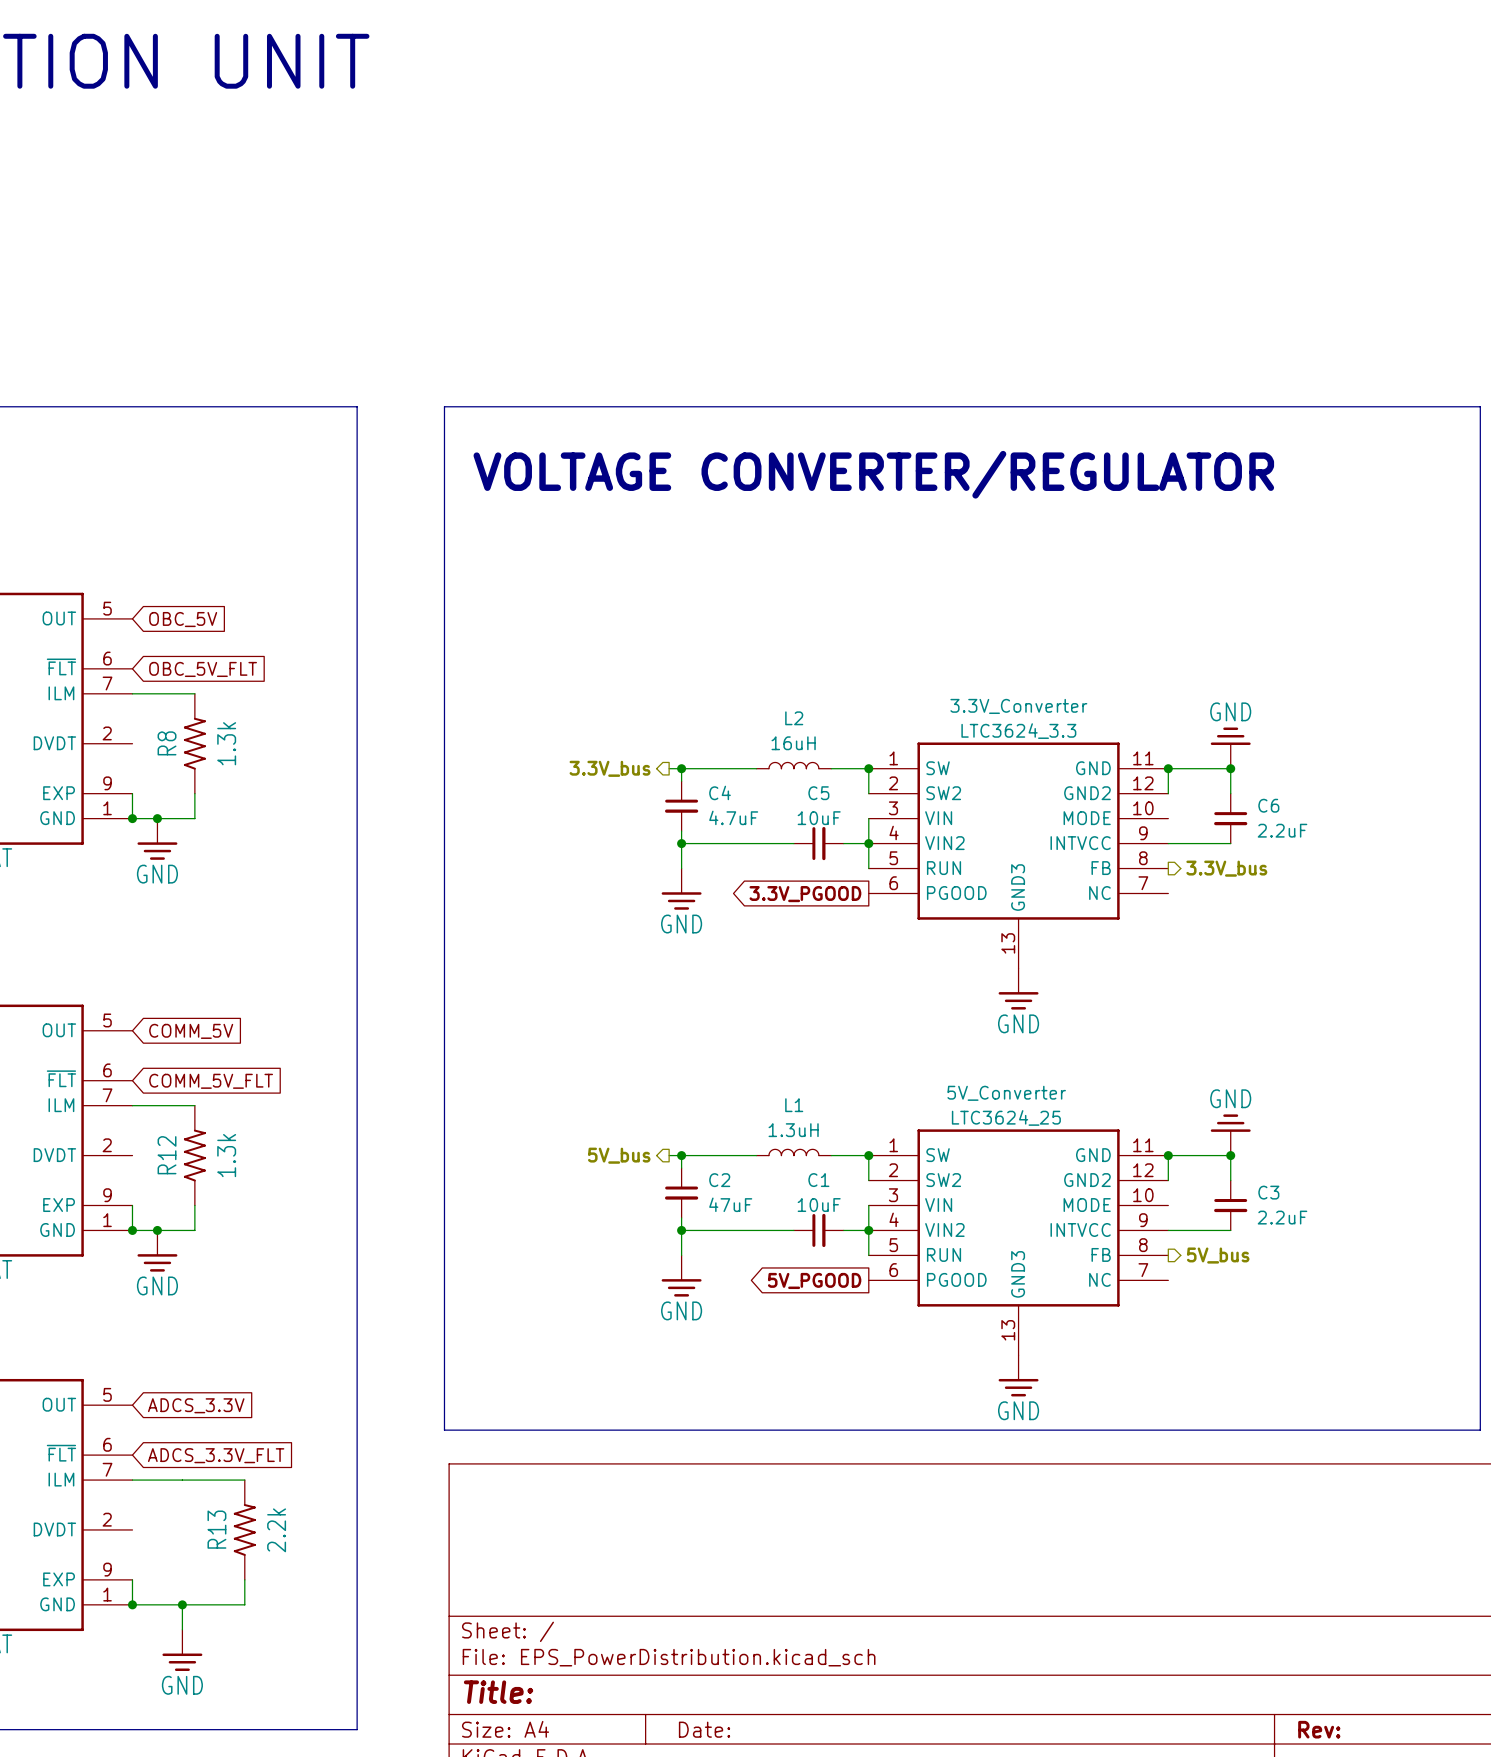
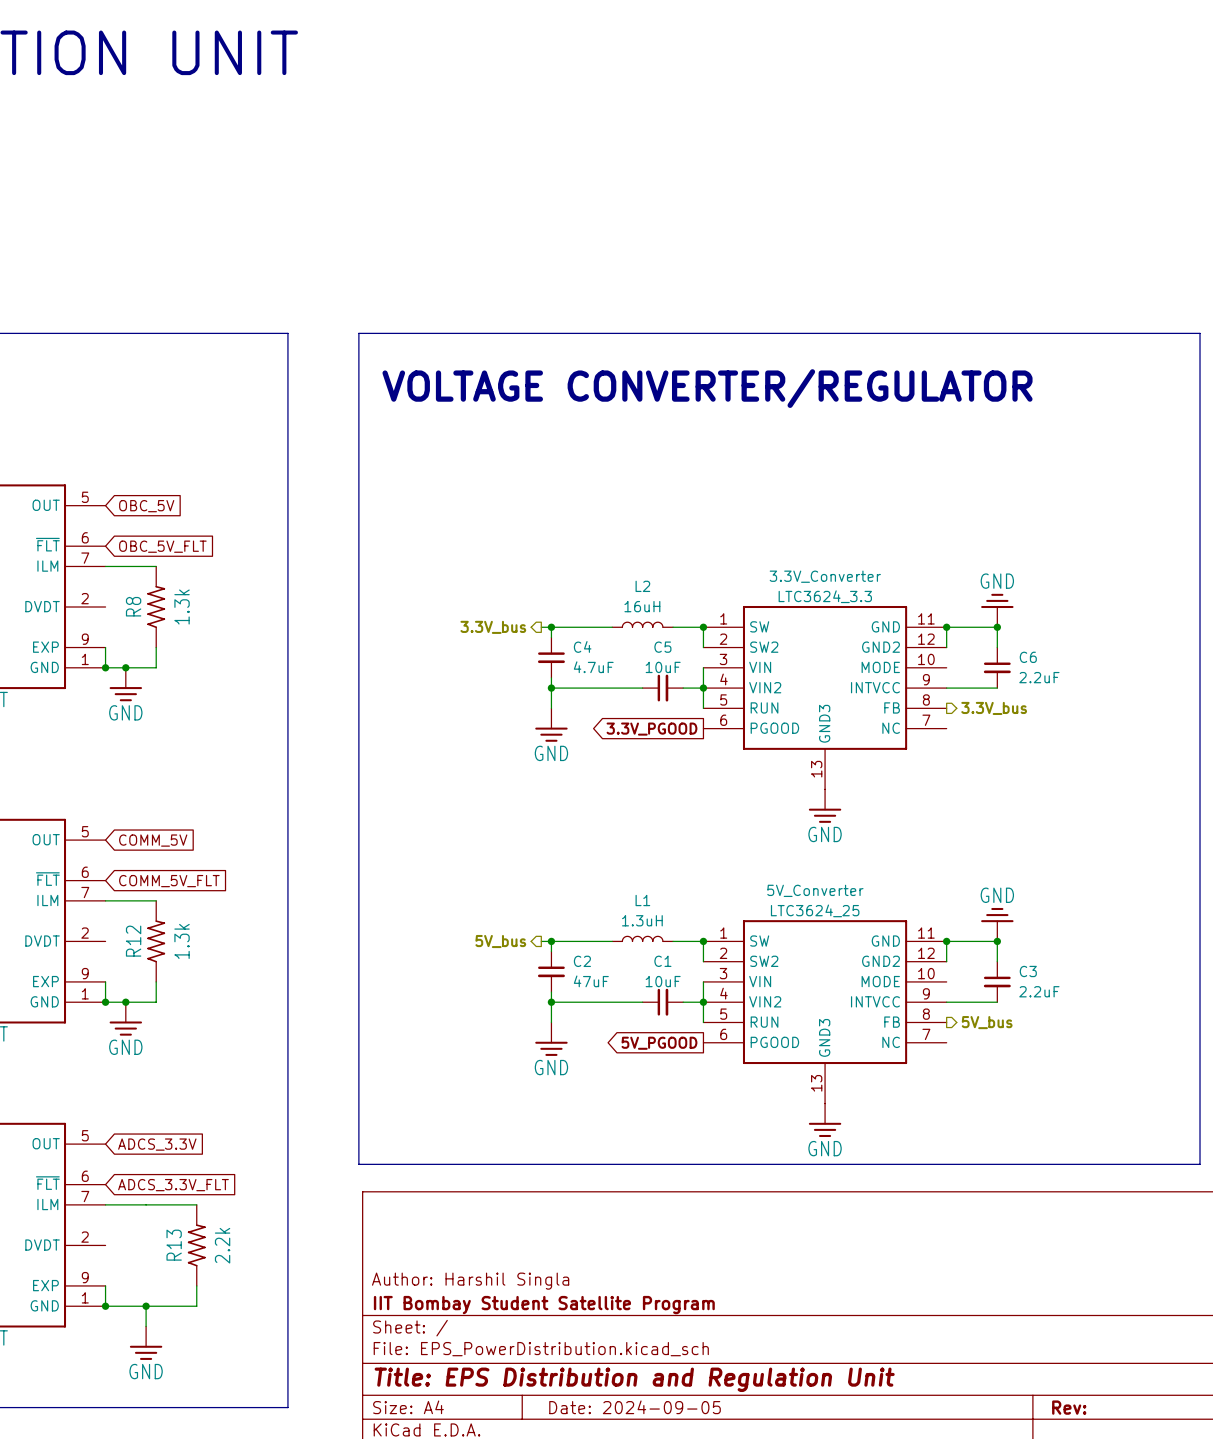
title block: none -> Author: Harshil Singla (470, 1281)
title block: none -> IIT Bombay Student Satellite Program (544, 1305)
title block: Title: (498, 1692) -> Title: EPS Distribution and Regulation Unit (634, 1379)
title block: Date: (704, 1729) -> Date: 2024-09-05 (635, 1407)

